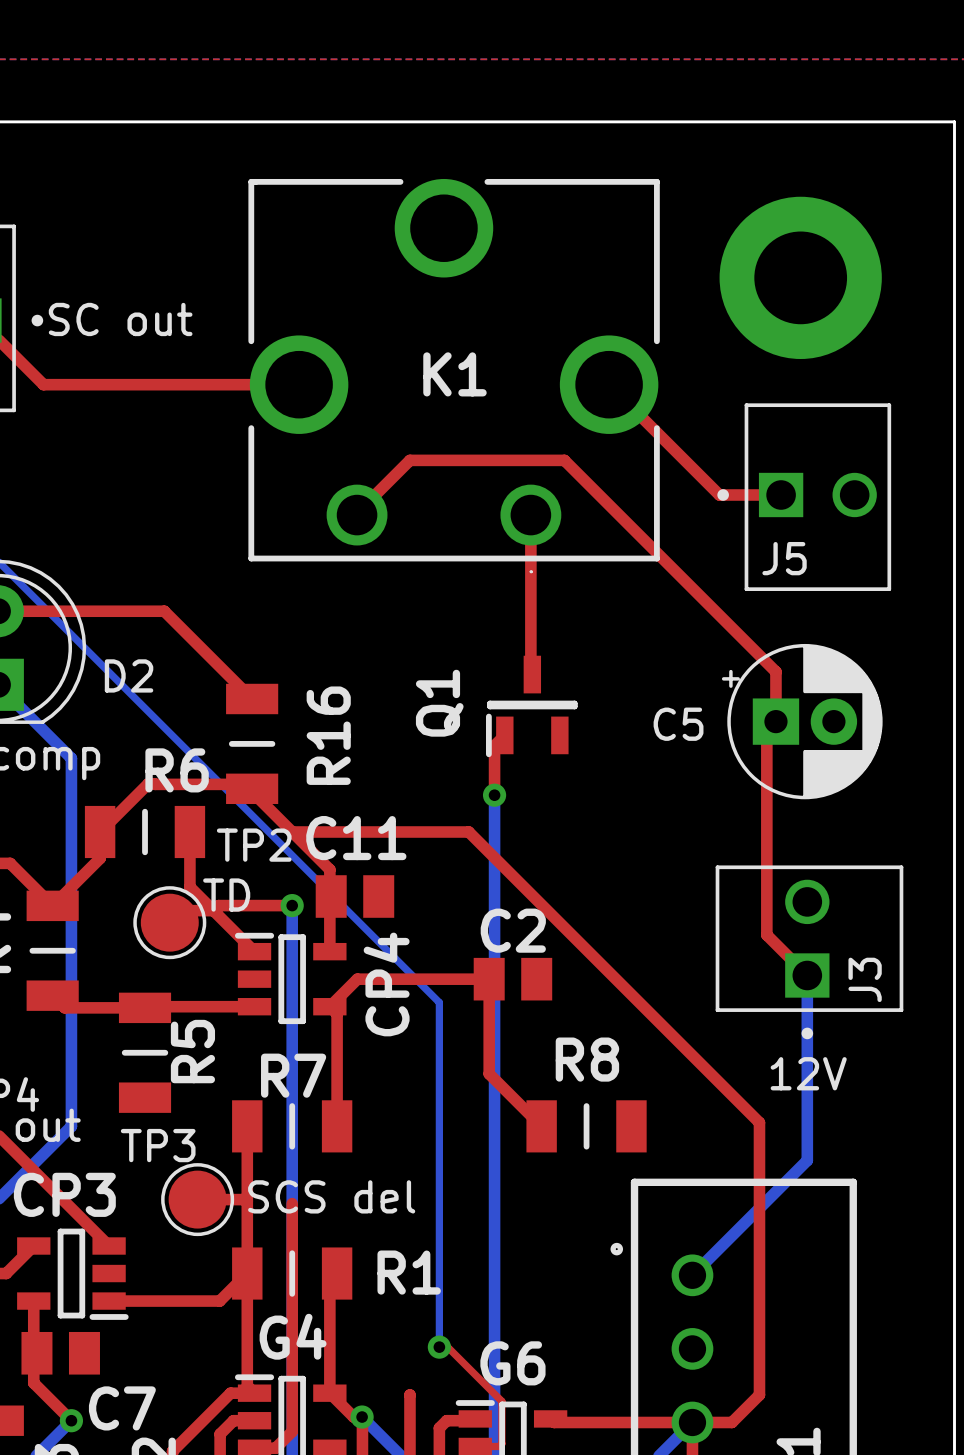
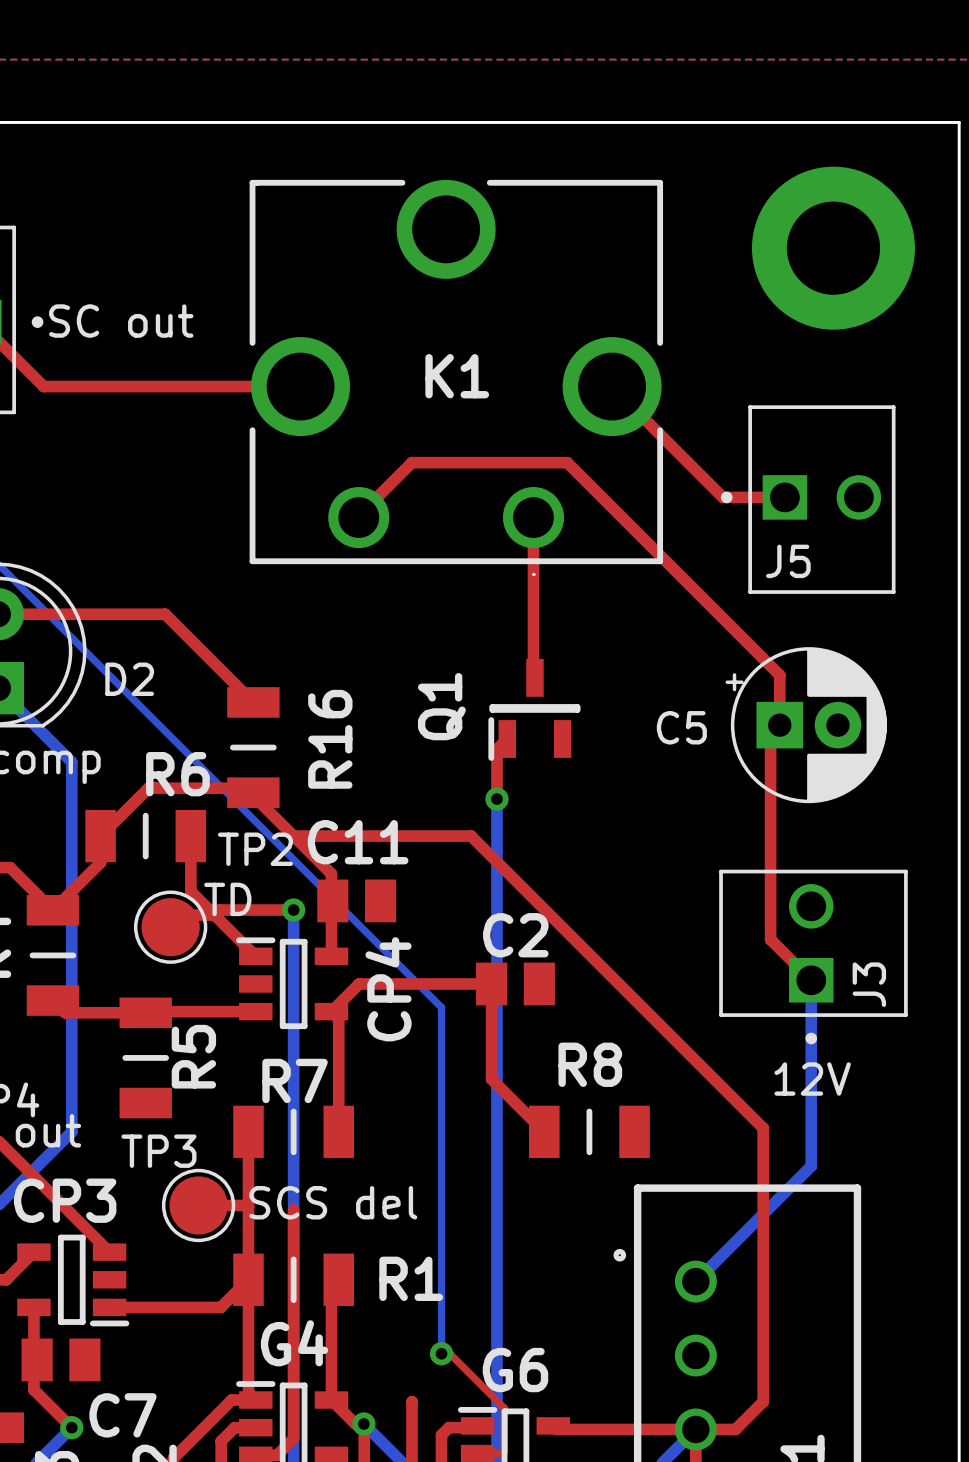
part position: (800, 277) -> (833, 248)

